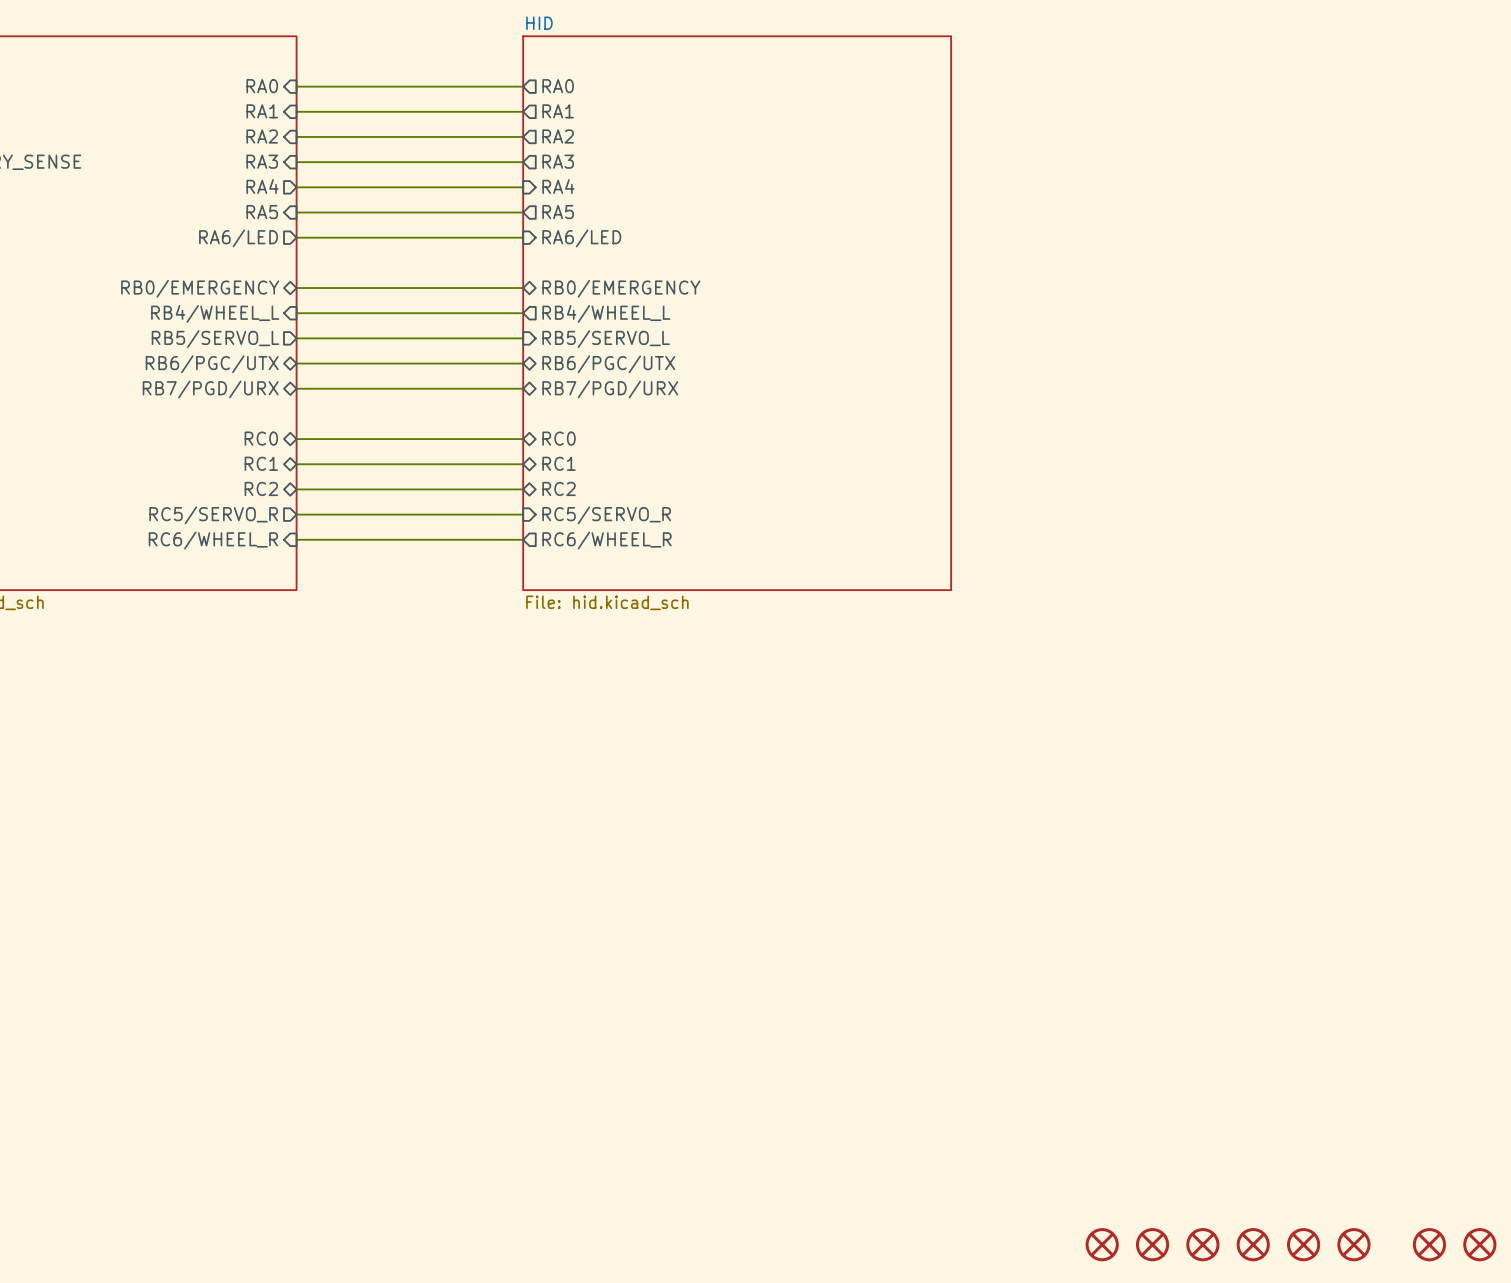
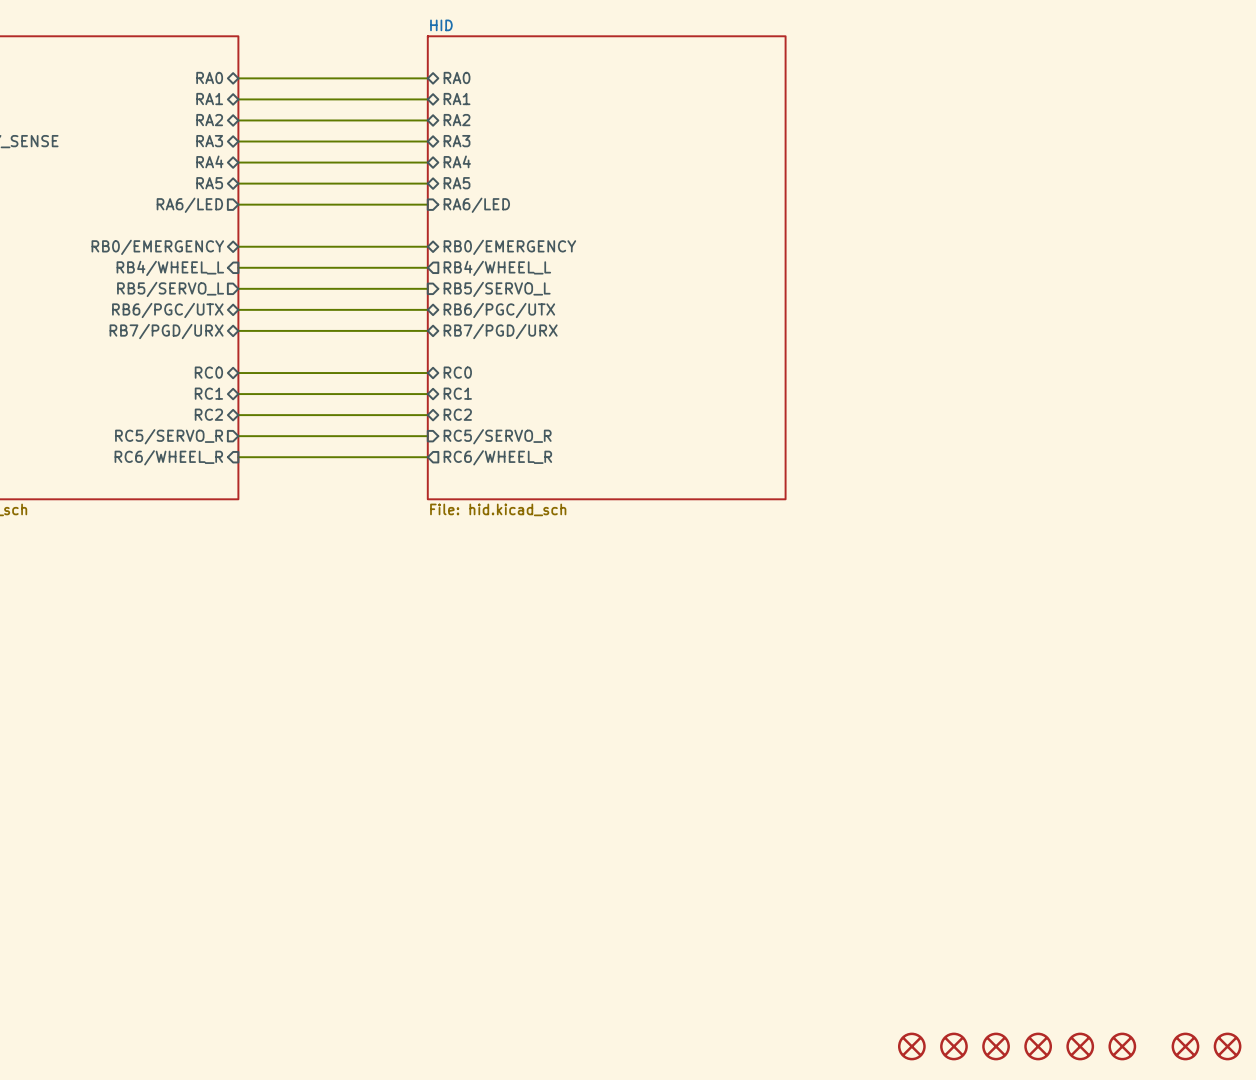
sheet pin shape: input (262, 86) -> bidirectional (209, 77)
sheet pin shape: output (558, 86) -> bidirectional (457, 77)
sheet pin shape: input (262, 111) -> bidirectional (209, 99)
sheet pin shape: output (558, 111) -> bidirectional (457, 99)
sheet pin shape: input (262, 136) -> bidirectional (209, 120)
sheet pin shape: output (558, 136) -> bidirectional (457, 120)
sheet pin shape: input (262, 161) -> bidirectional (209, 141)
sheet pin shape: output (558, 161) -> bidirectional (457, 141)
sheet pin shape: output (262, 186) -> bidirectional (209, 161)
sheet pin shape: input (558, 186) -> bidirectional (457, 161)
sheet pin shape: input (262, 212) -> bidirectional (209, 183)
sheet pin shape: output (558, 212) -> bidirectional (457, 183)

